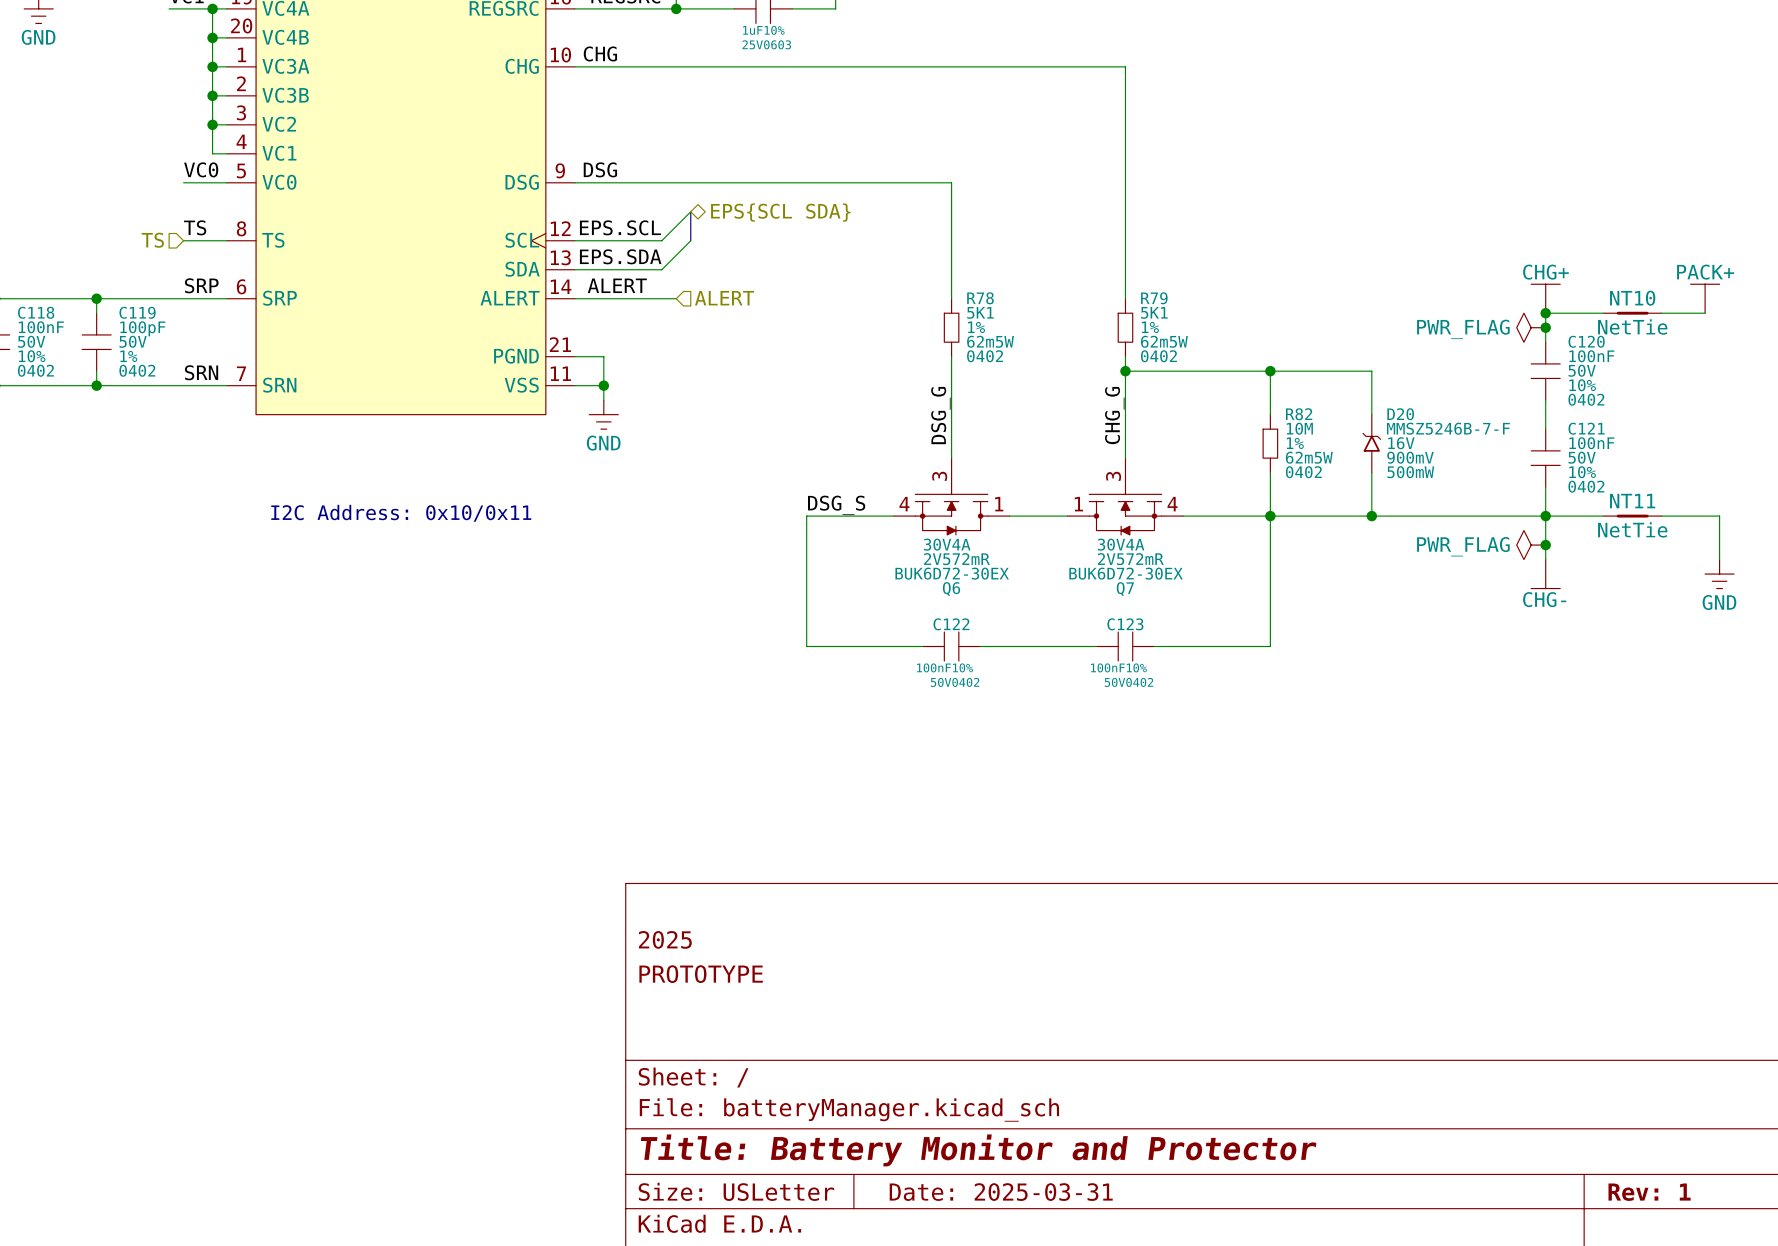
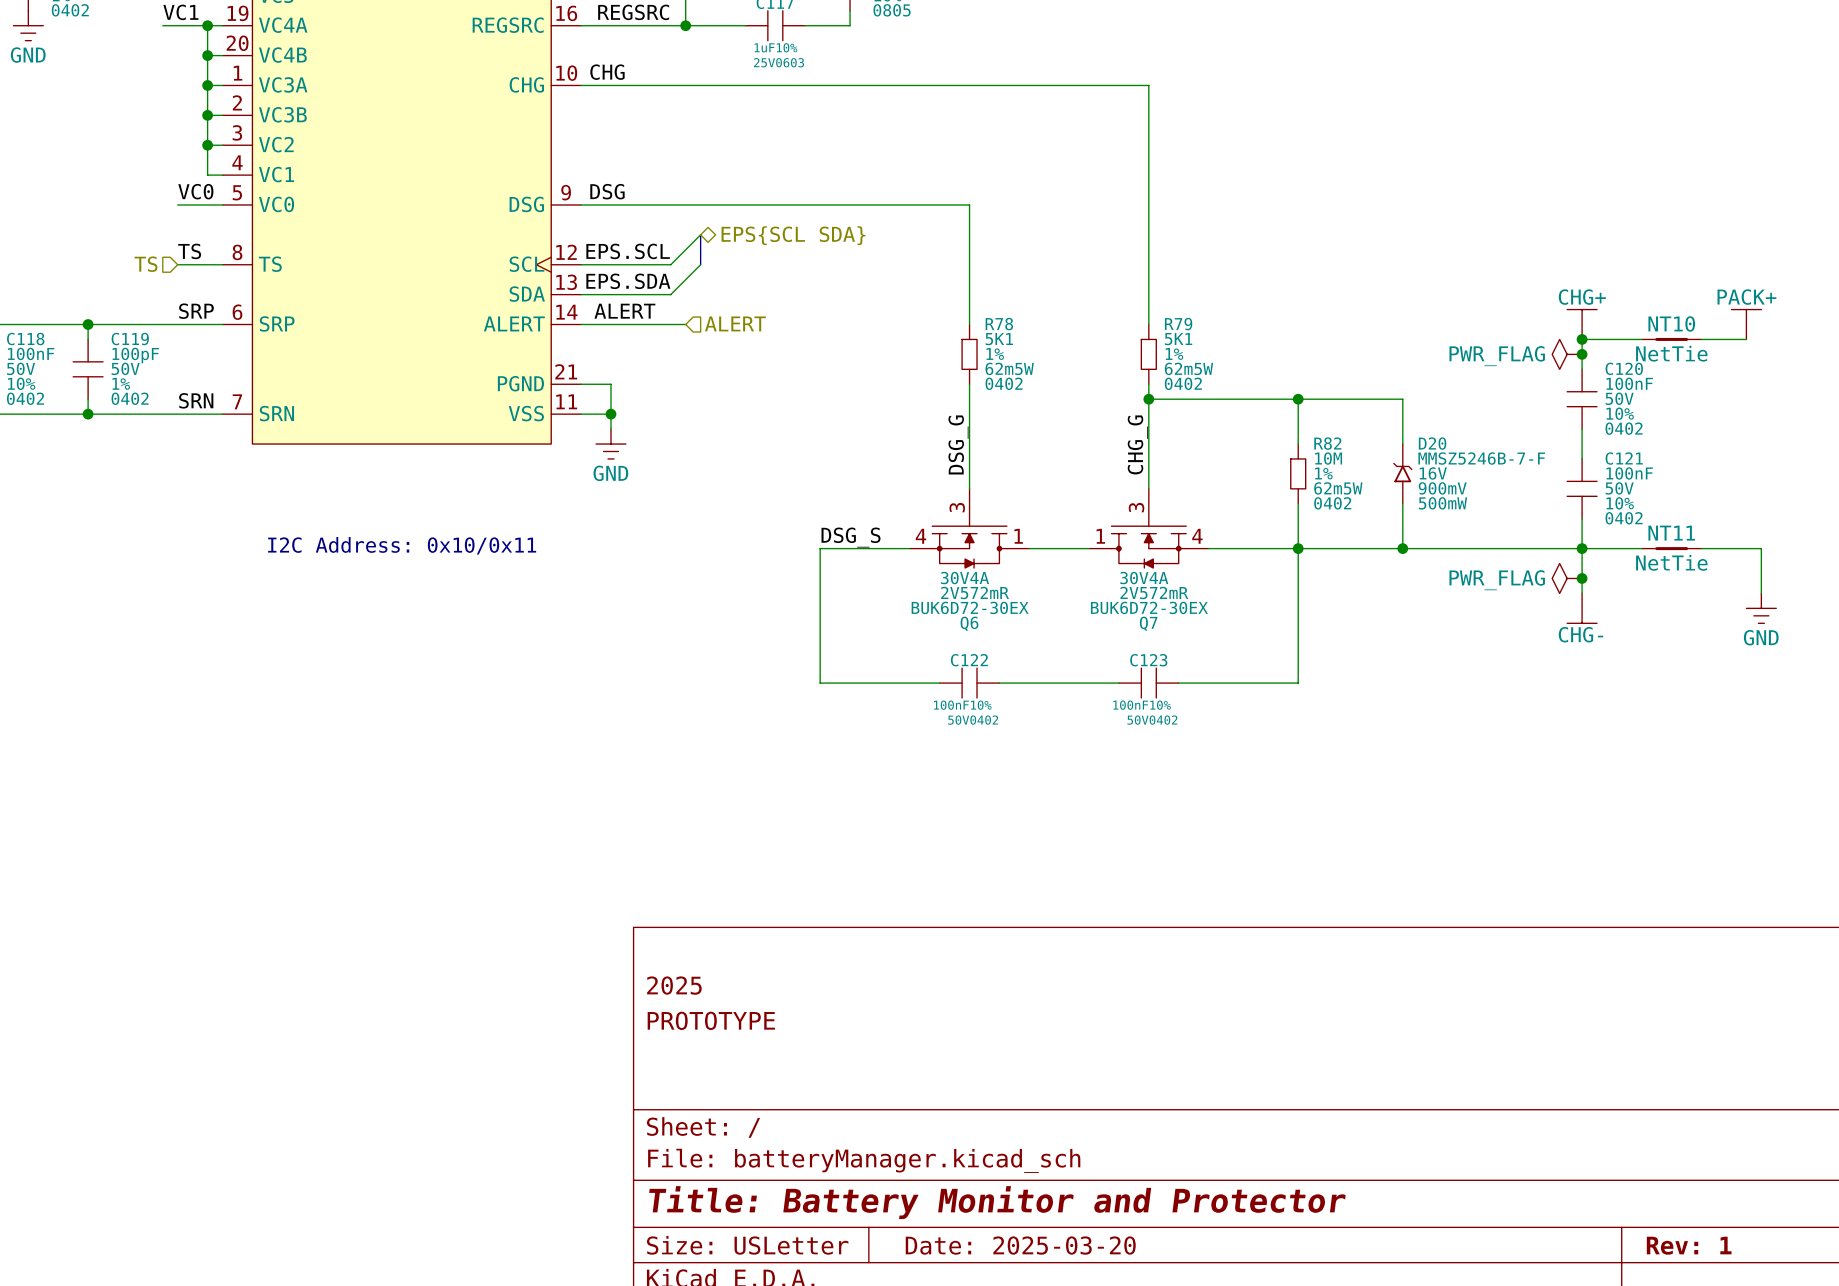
title block: Date: 2025-03-31 (1001, 1192) -> Date: 2025-03-20 (1020, 1245)

